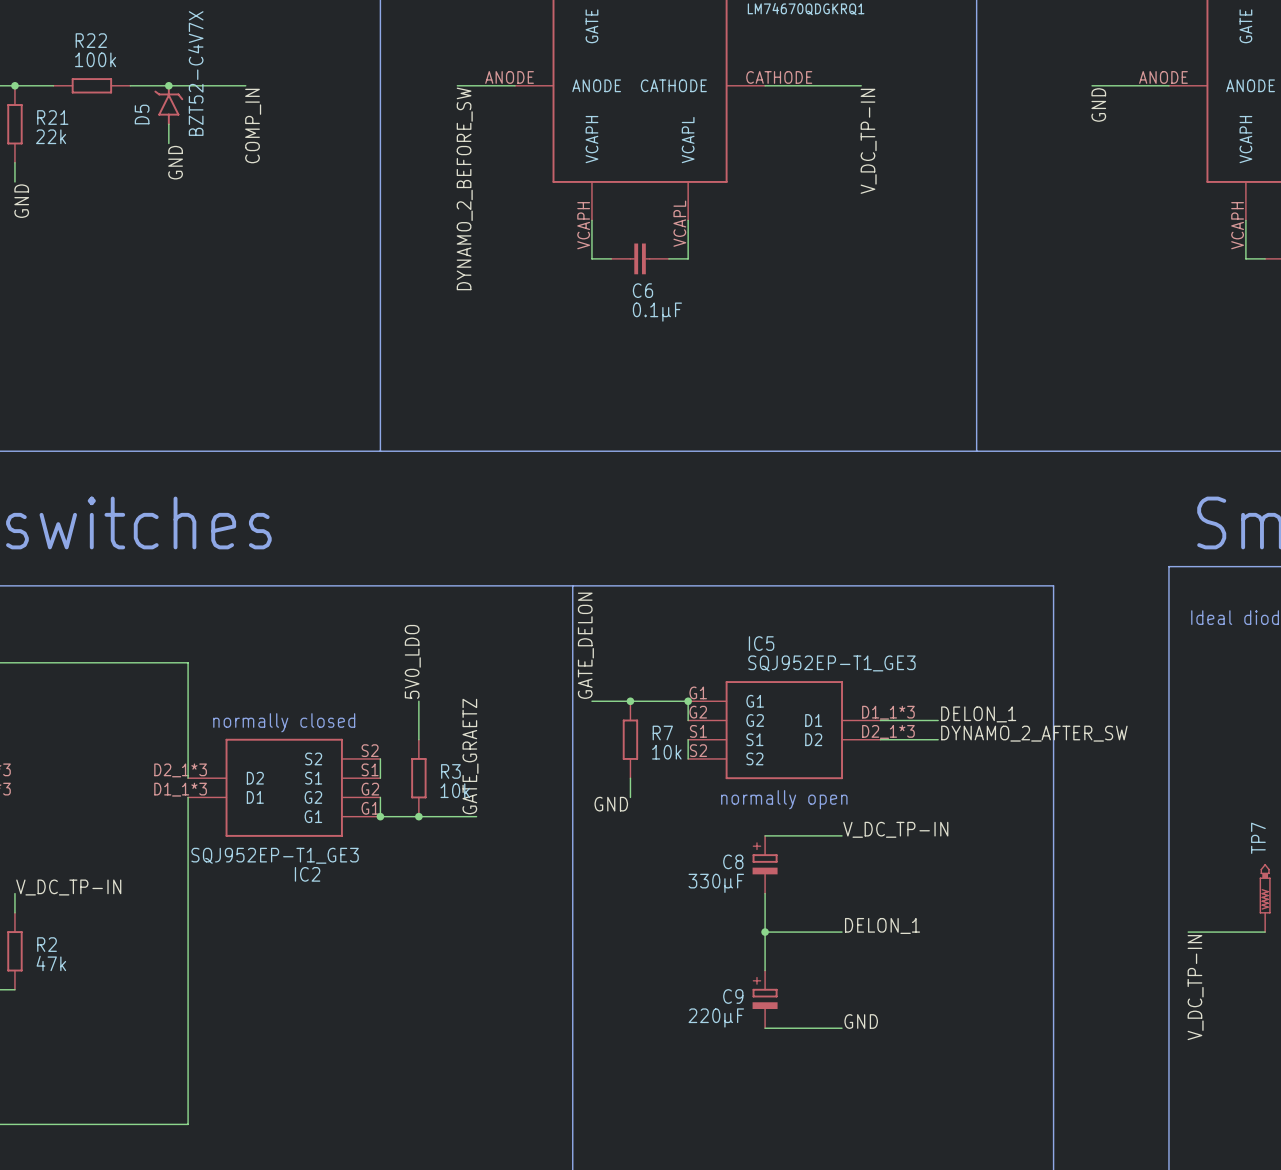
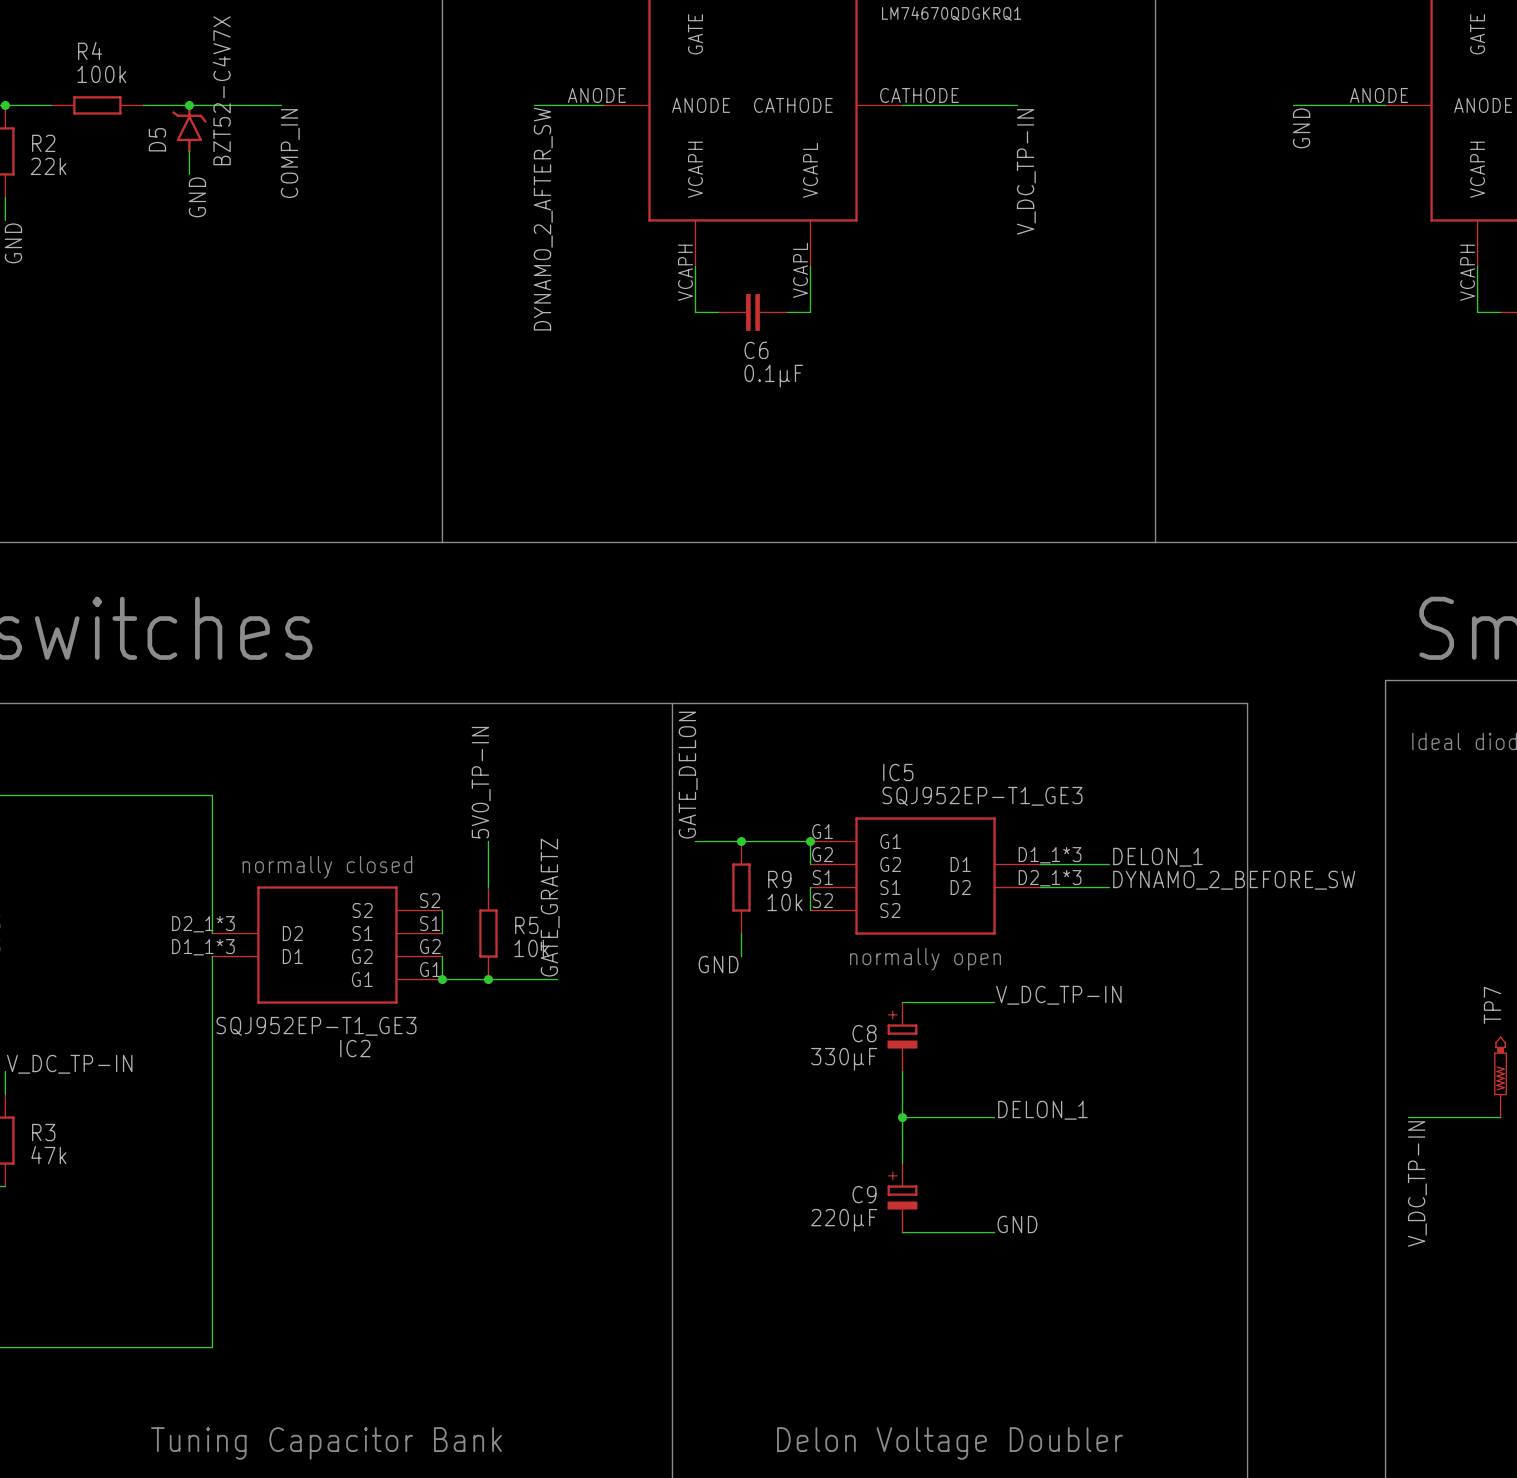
R22 name: R22 (91, 40) -> R4 (90, 50)
R21 name: R21 (52, 117) -> R2 (43, 143)
label: DYNAMO_2_BEFORE_SW (464, 188) -> DYNAMO_2_AFTER_SW (543, 219)
label: 5V0_LDO (412, 661) -> 5V0_TP-IN (481, 782)
R7 name: R7 (662, 733) -> R9 (779, 879)
label: DYNAMO_2_AFTER_SW (1034, 733) -> DYNAMO_2_BEFORE_SW (1234, 880)
R3 name: R3 (450, 771) -> R5 (526, 925)
R2 name: R2 (47, 944) -> R3 (43, 1132)

